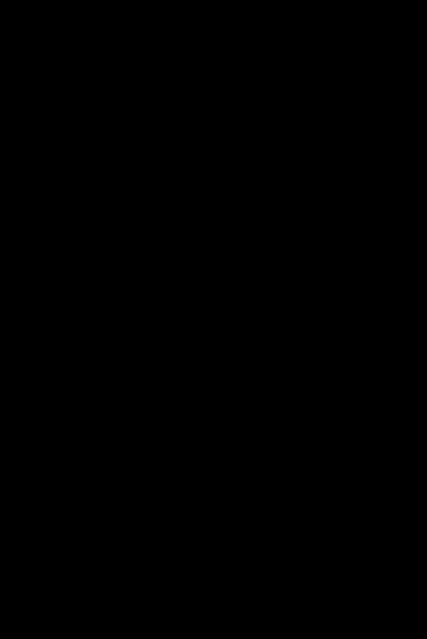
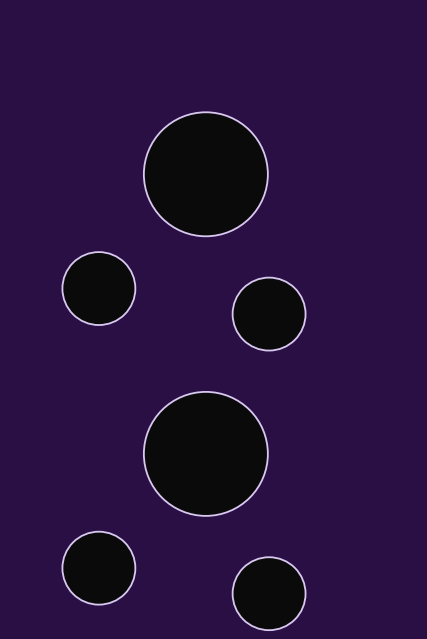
part: none -> (183, 231)
part: none -> (183, 511)

